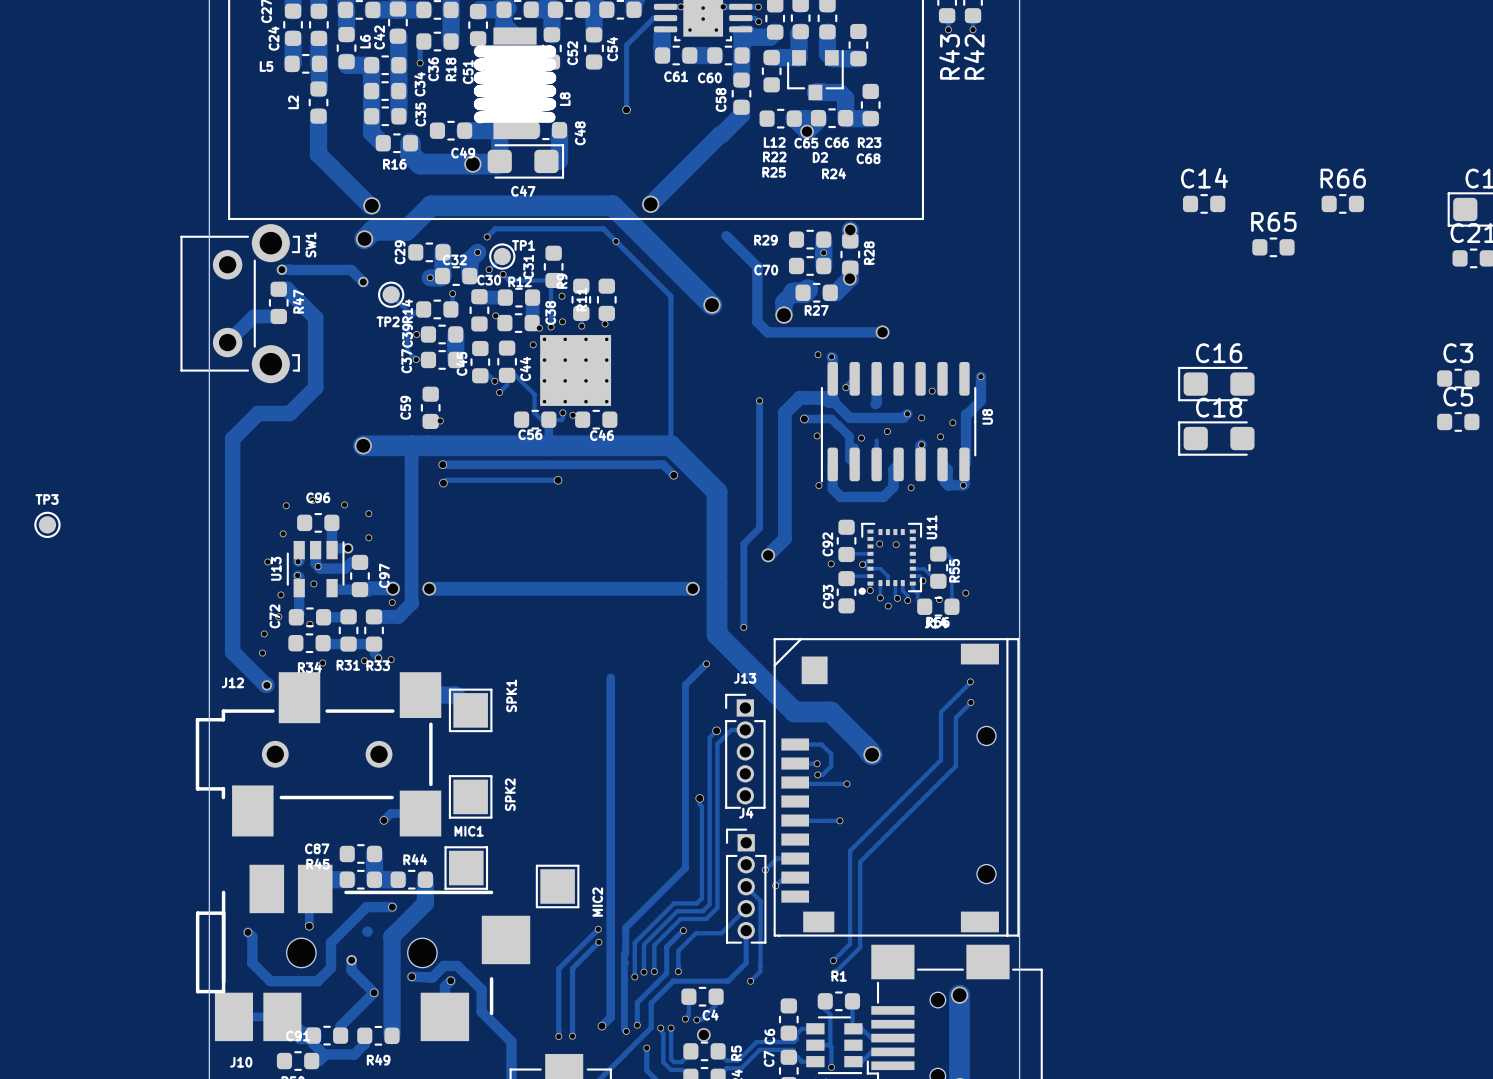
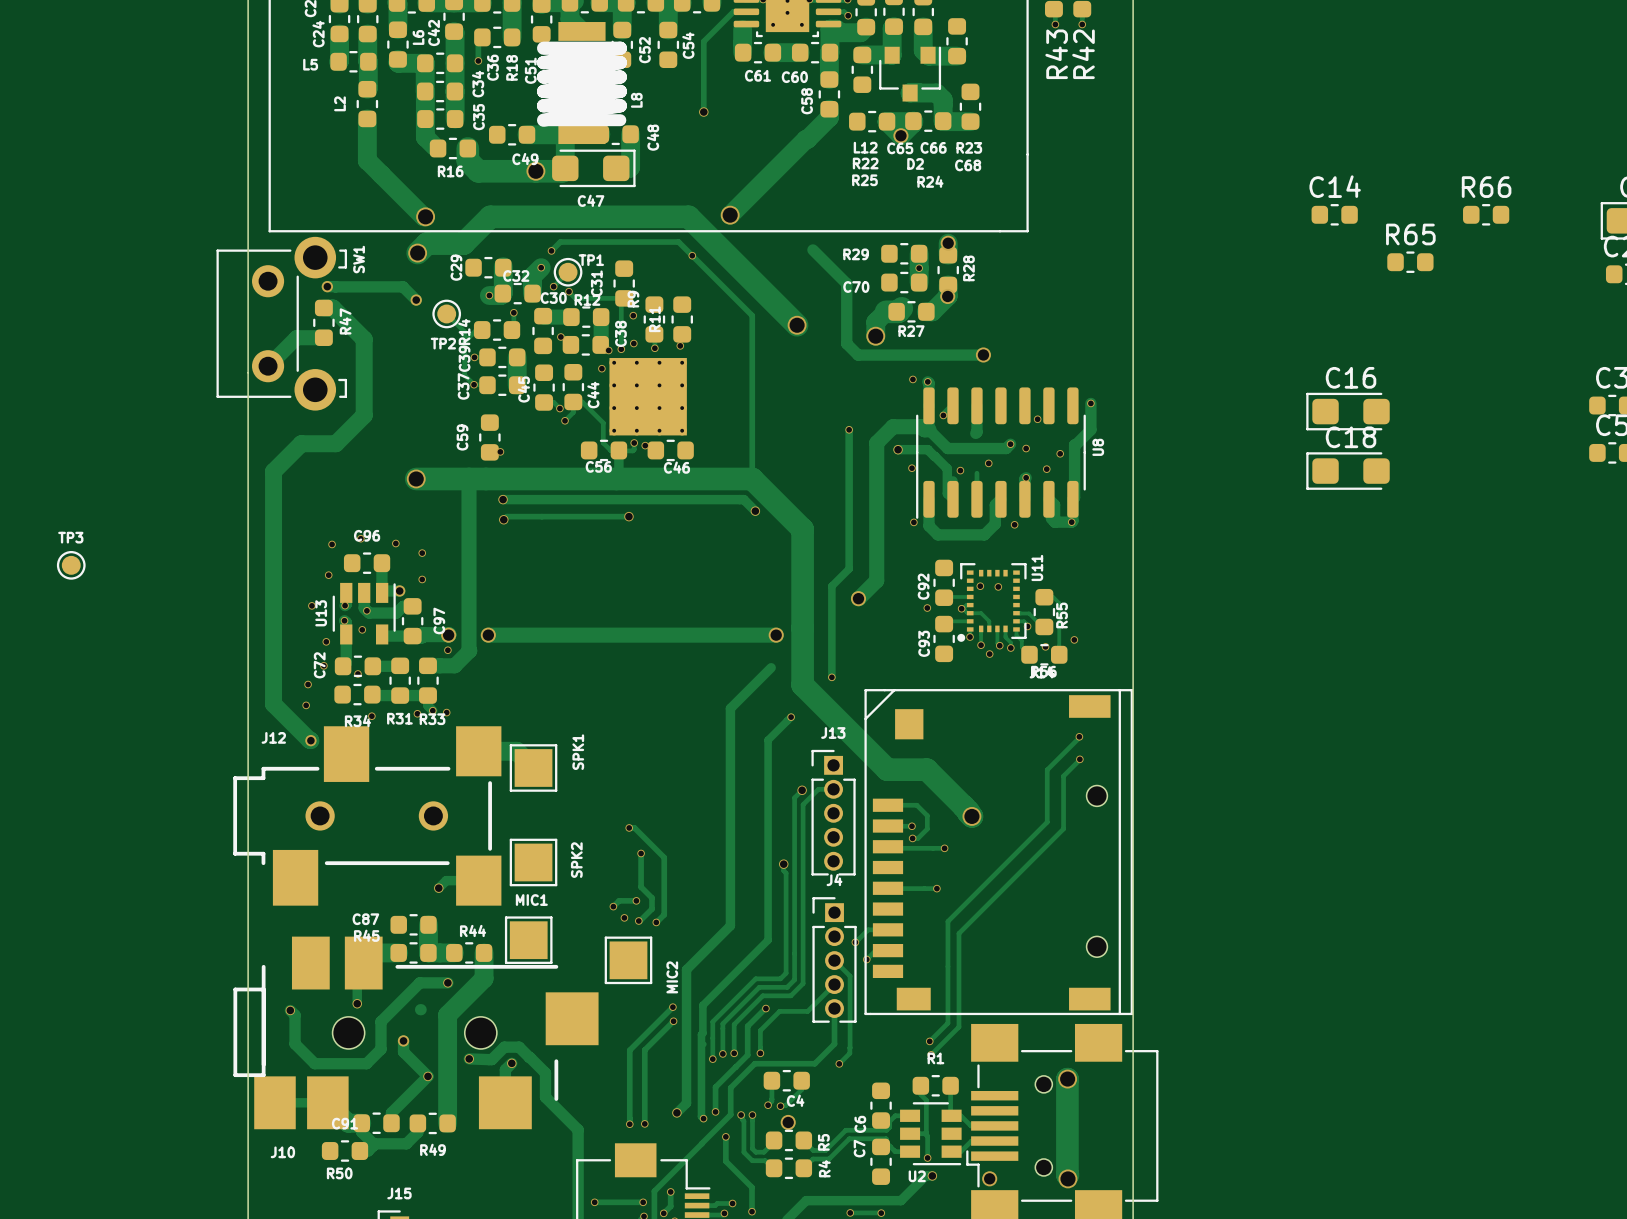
track: (610, 677) (610, 895) -> (771, 667) (730, 708) (730, 925) (686, 969)
track: none -> (629, 827) (634, 827) (664, 857) (664, 914) (656, 922)
via: none -> (629, 827)
track: none -> (641, 853) (641, 887) (652, 897) (652, 909) (638, 921)
via: none -> (641, 853)
track: none -> (636, 900) (619, 900) (613, 906)
via: none -> (636, 900)
via: none -> (613, 906)
via: none -> (624, 917)
via: none -> (638, 921)
via: none -> (656, 922)

